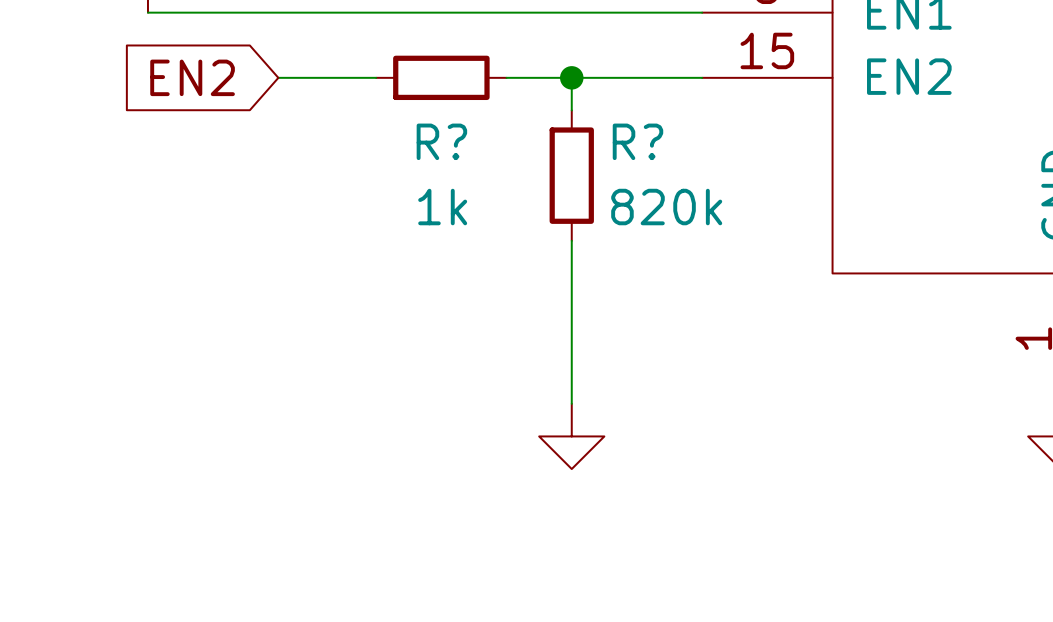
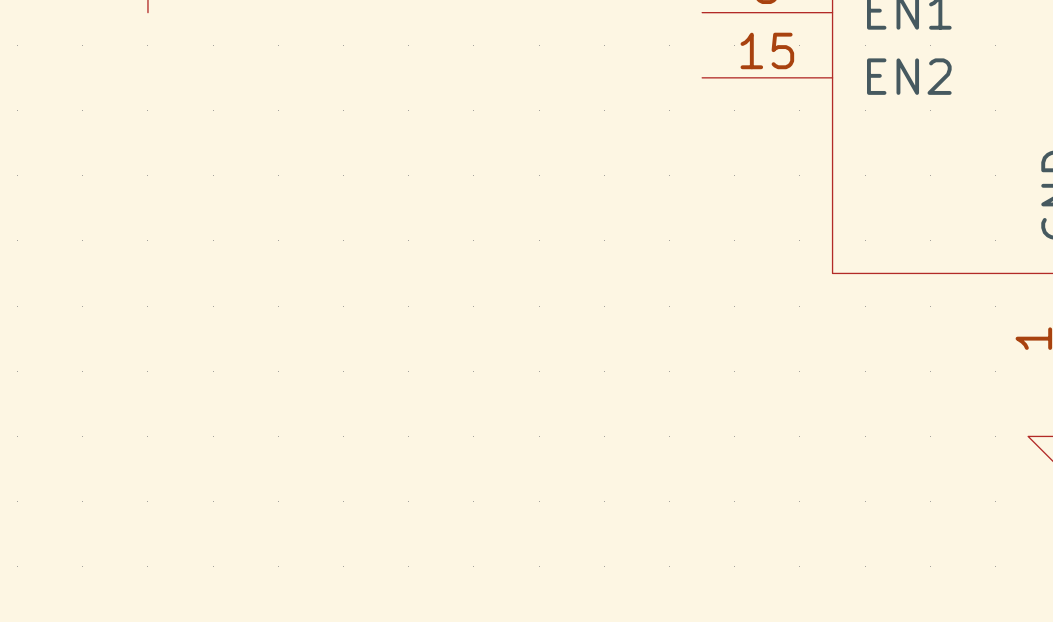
wire: (147, 12) (702, 12) -> none
global label: EN2 (192, 77) -> none
wire: (278, 77) (376, 77) -> none
R?: 1k (441, 77) -> none
wire: (506, 77) (702, 77) -> none
wire: (571, 77) (571, 110) -> none
junction: (571, 77) -> none
R?: 820k (571, 175) -> none
wire: (571, 240) (571, 403) -> none
power symbol: (571, 436) -> none

